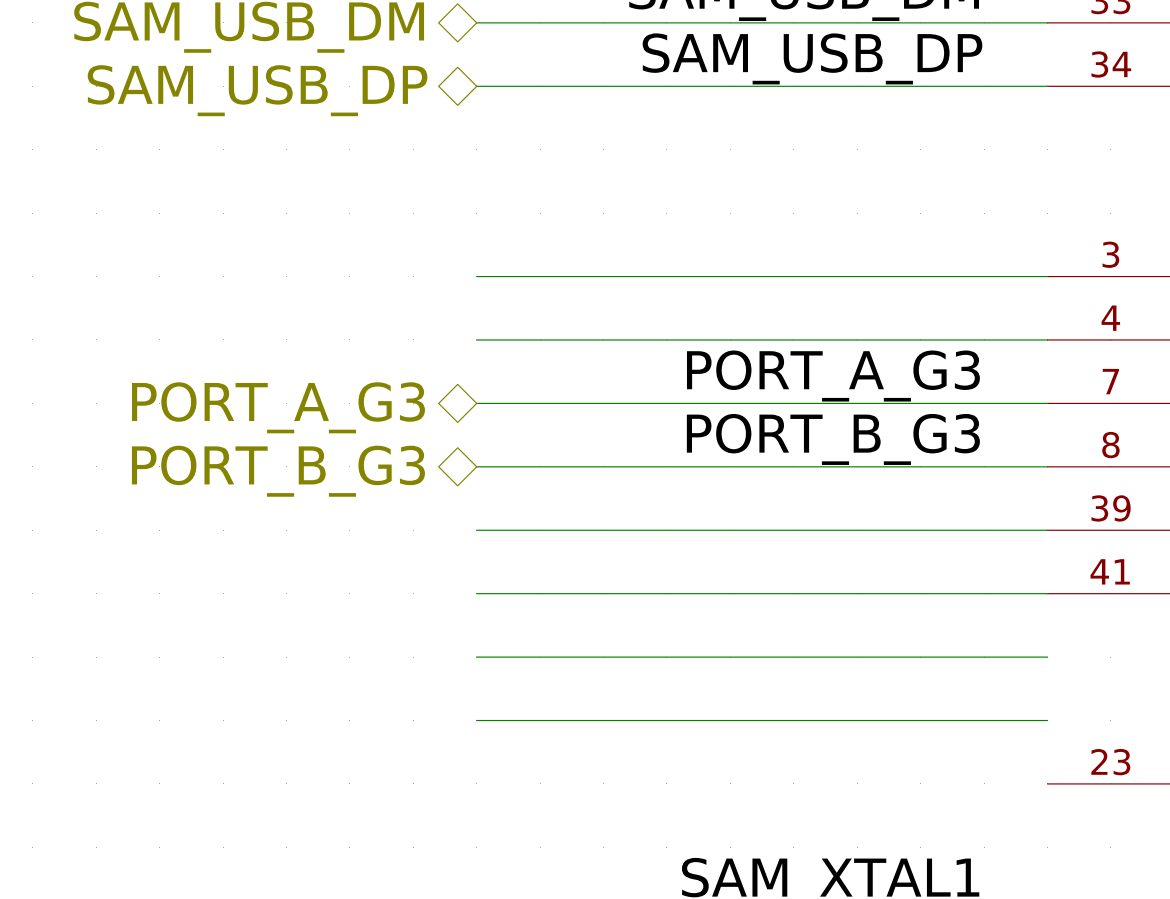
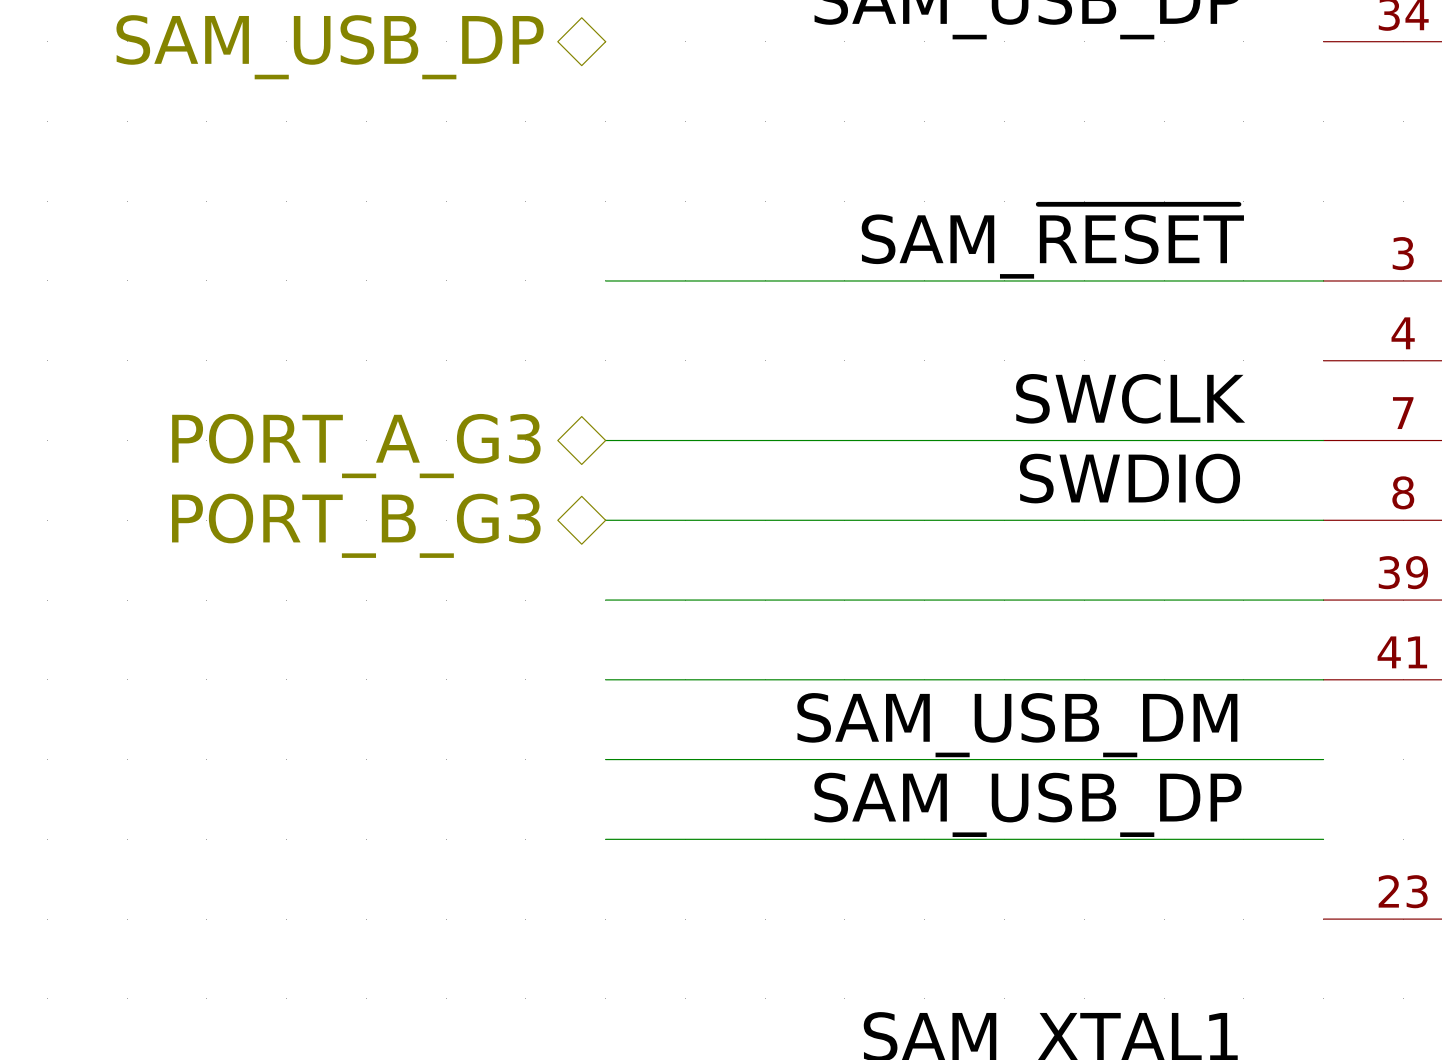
wire: (476, 86) (1047, 86) -> none
label: none -> SAM_~{RESET} (1052, 241)
wire: (476, 339) (1047, 339) -> none
label: PORT_A_G3 (833, 376) -> SWCLK (1130, 398)
label: PORT_B_G3 (833, 439) -> SWDIO (1130, 478)
label: none -> SAM_USB_DM (1017, 725)
label: none -> SAM_USB_DP (1027, 804)

